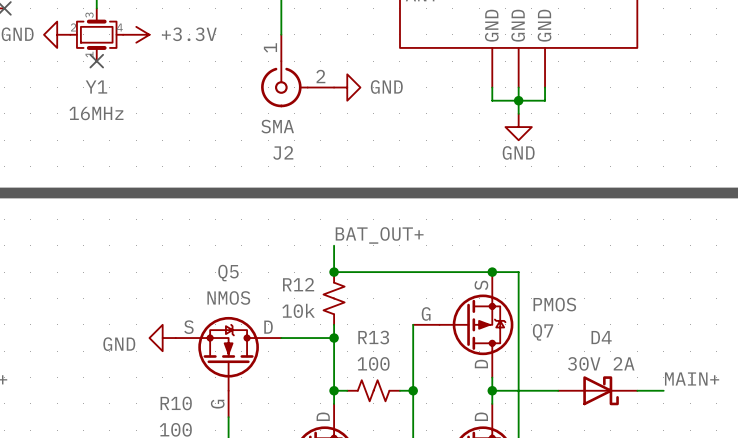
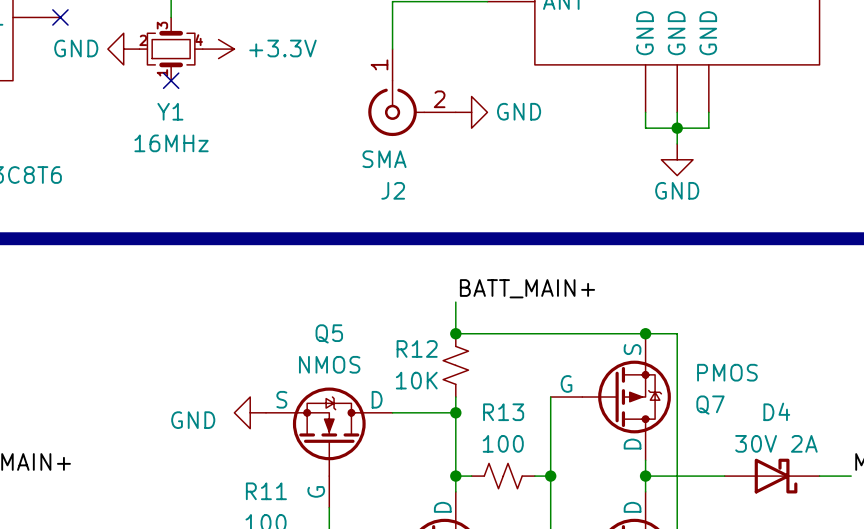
label: BAT_OUT+ (379, 235) -> BATT_MAIN+ (527, 288)
R12 value: 10k (298, 310) -> 10K (416, 380)
R10 name: R10 (176, 403) -> R11 (266, 491)

